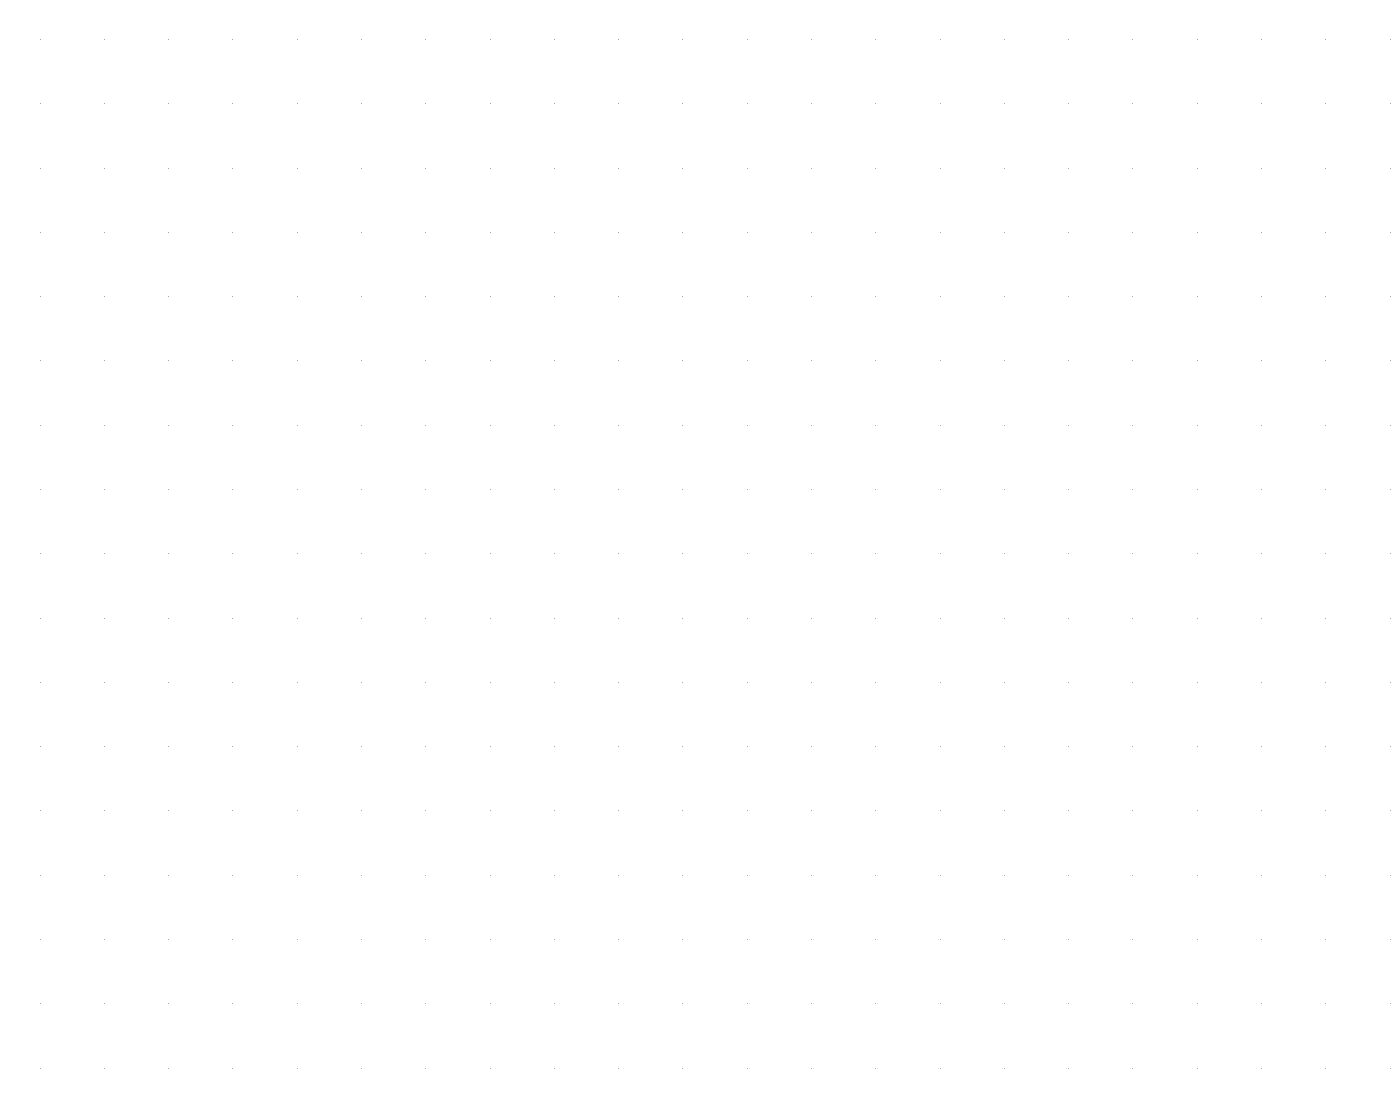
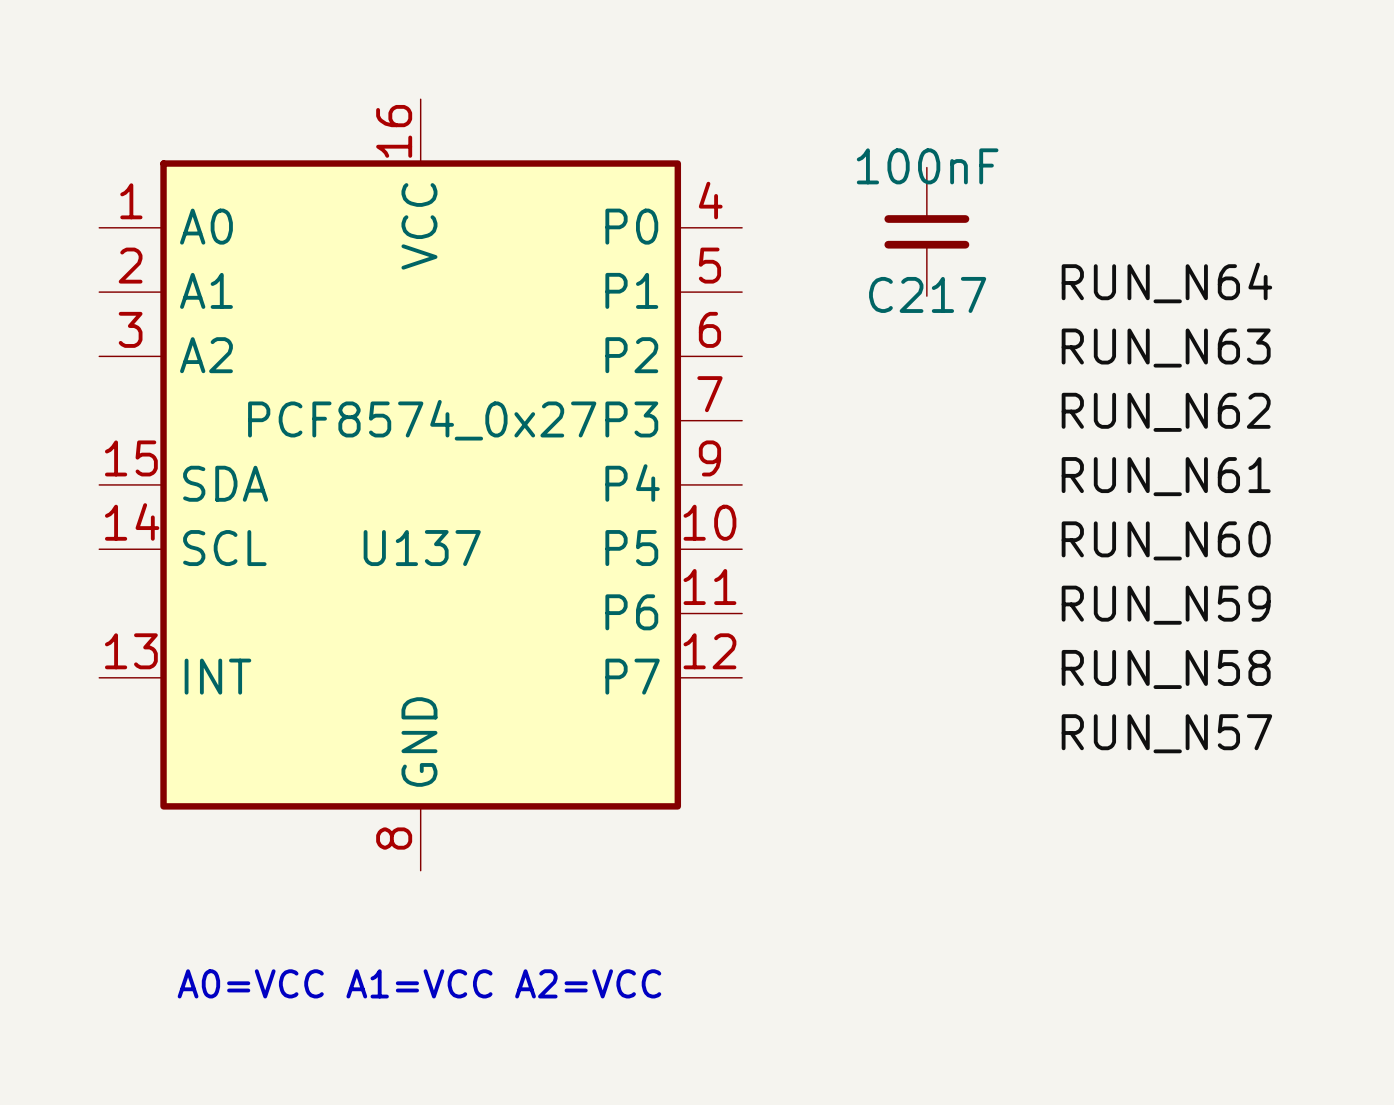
C217: none -> 100nF (926, 231)
label: none -> RUN_N64 (1166, 282)
label: none -> RUN_N63 (1166, 348)
label: none -> RUN_N62 (1166, 412)
label: none -> RUN_N61 (1166, 476)
U137: none -> PCF8574_0x27 (420, 484)
label: none -> RUN_N60 (1166, 540)
label: none -> RUN_N59 (1166, 605)
label: none -> RUN_N58 (1166, 669)
label: none -> RUN_N57 (1166, 733)
text: none -> A0=VCC A1=VCC A2=VCC (419, 983)

